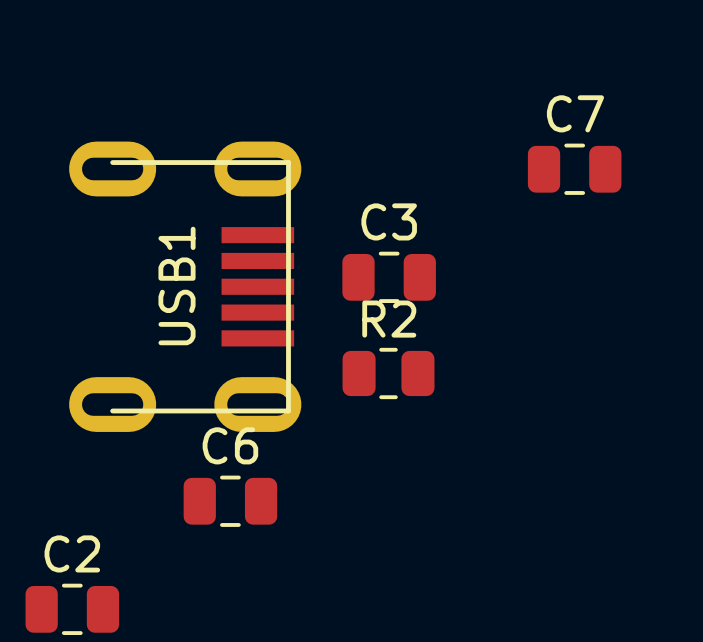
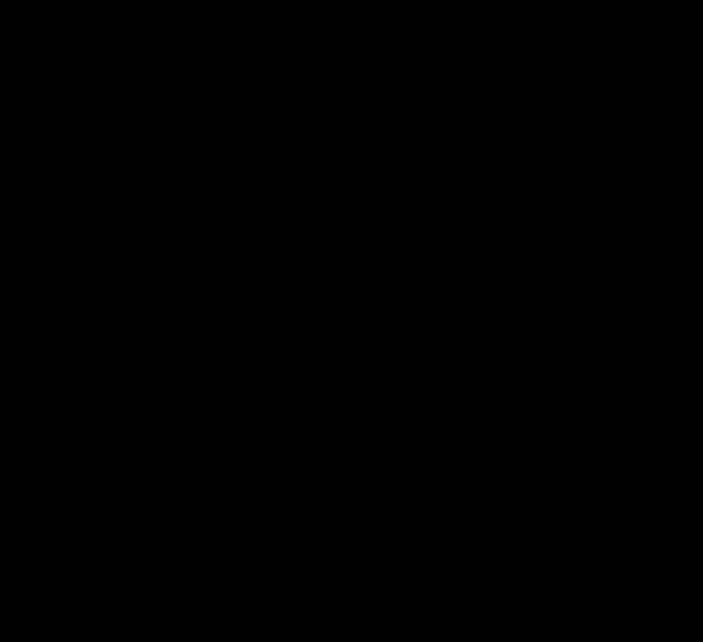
C7: (574, 169) -> none
C3: (389, 277) -> none
USB1: (185, 286) -> none
R2: (388, 373) -> none
C6: (230, 501) -> none
C2: (72, 609) -> none

